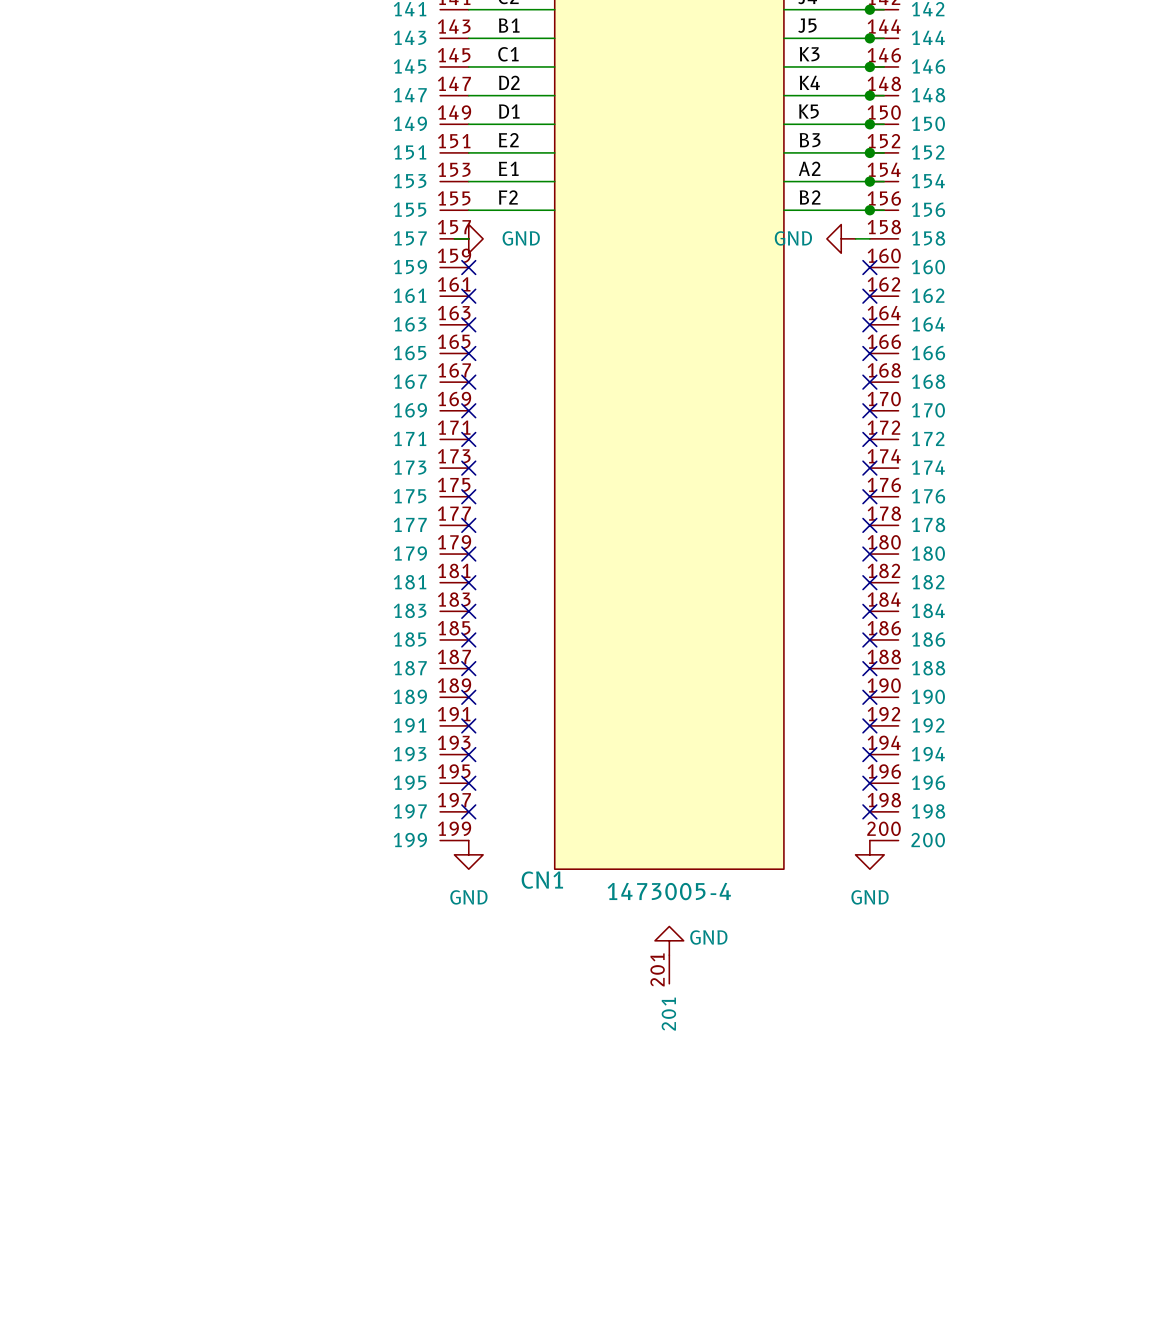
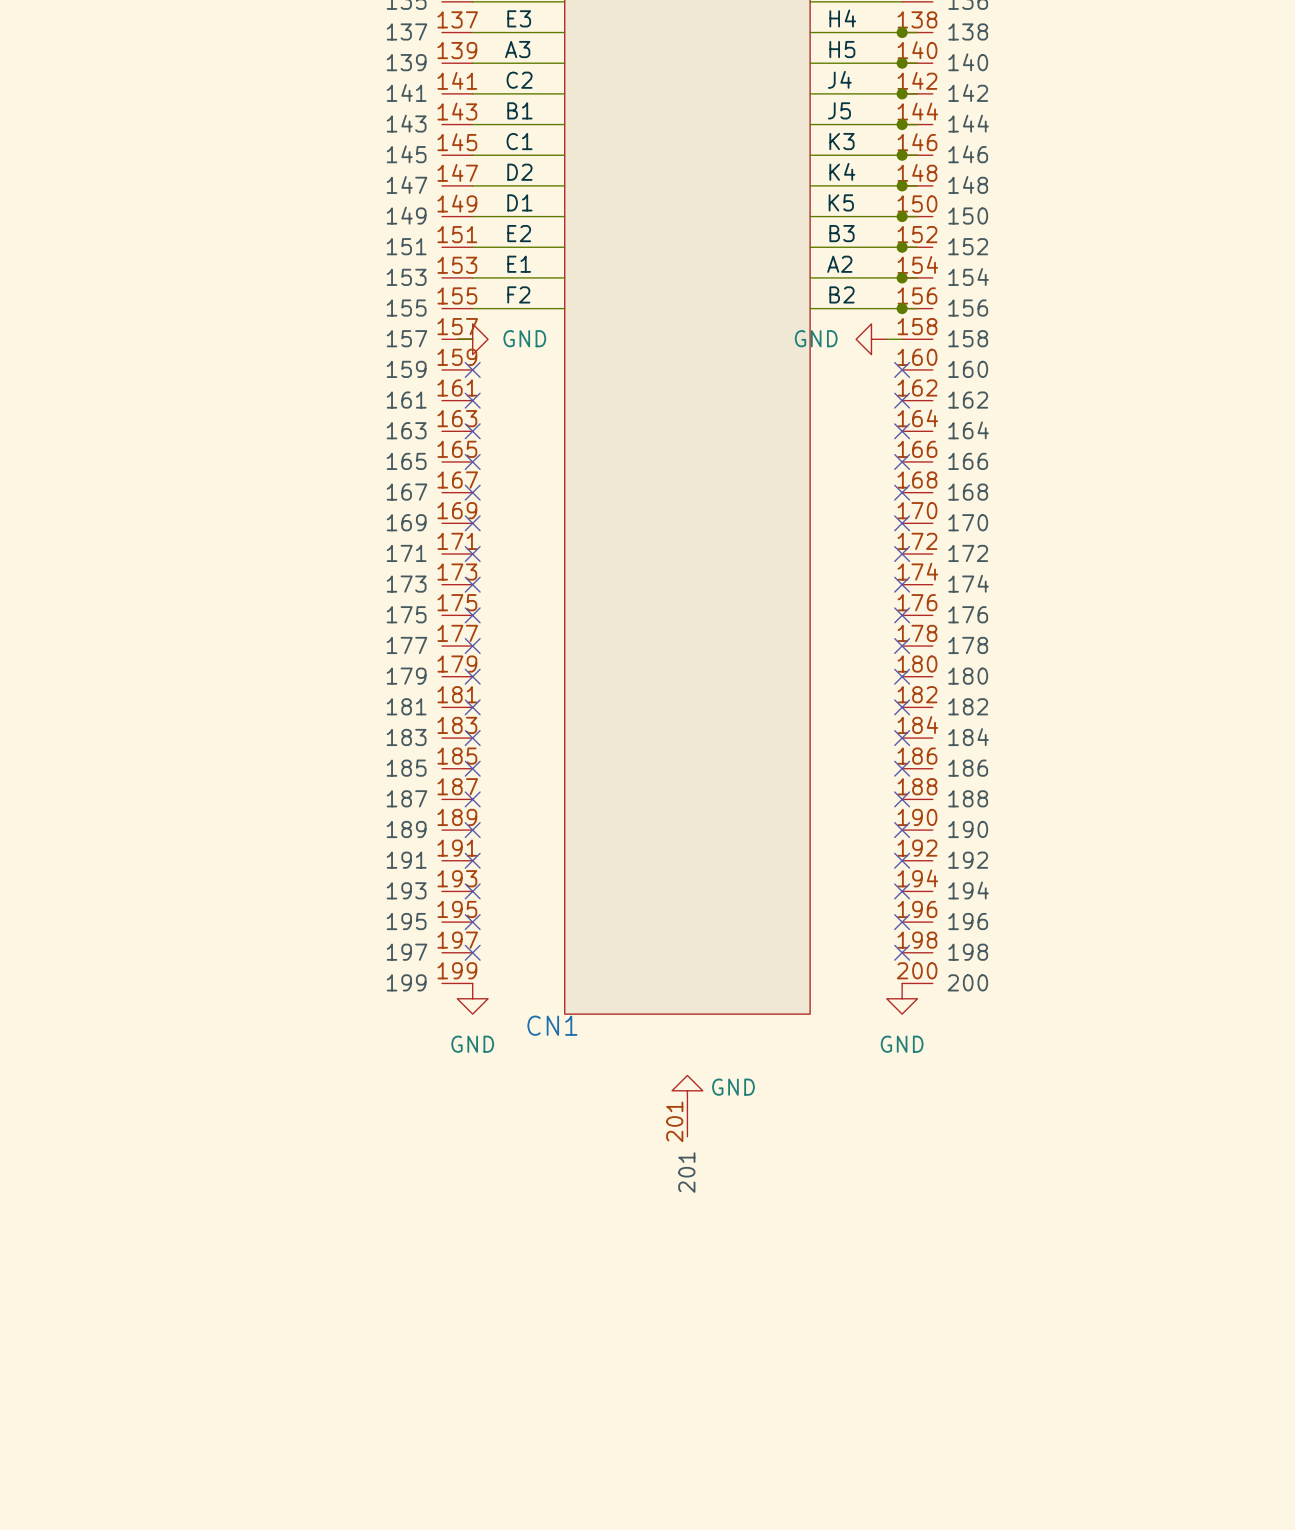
CN1 value: 1473005-4 (669, 891) -> none

